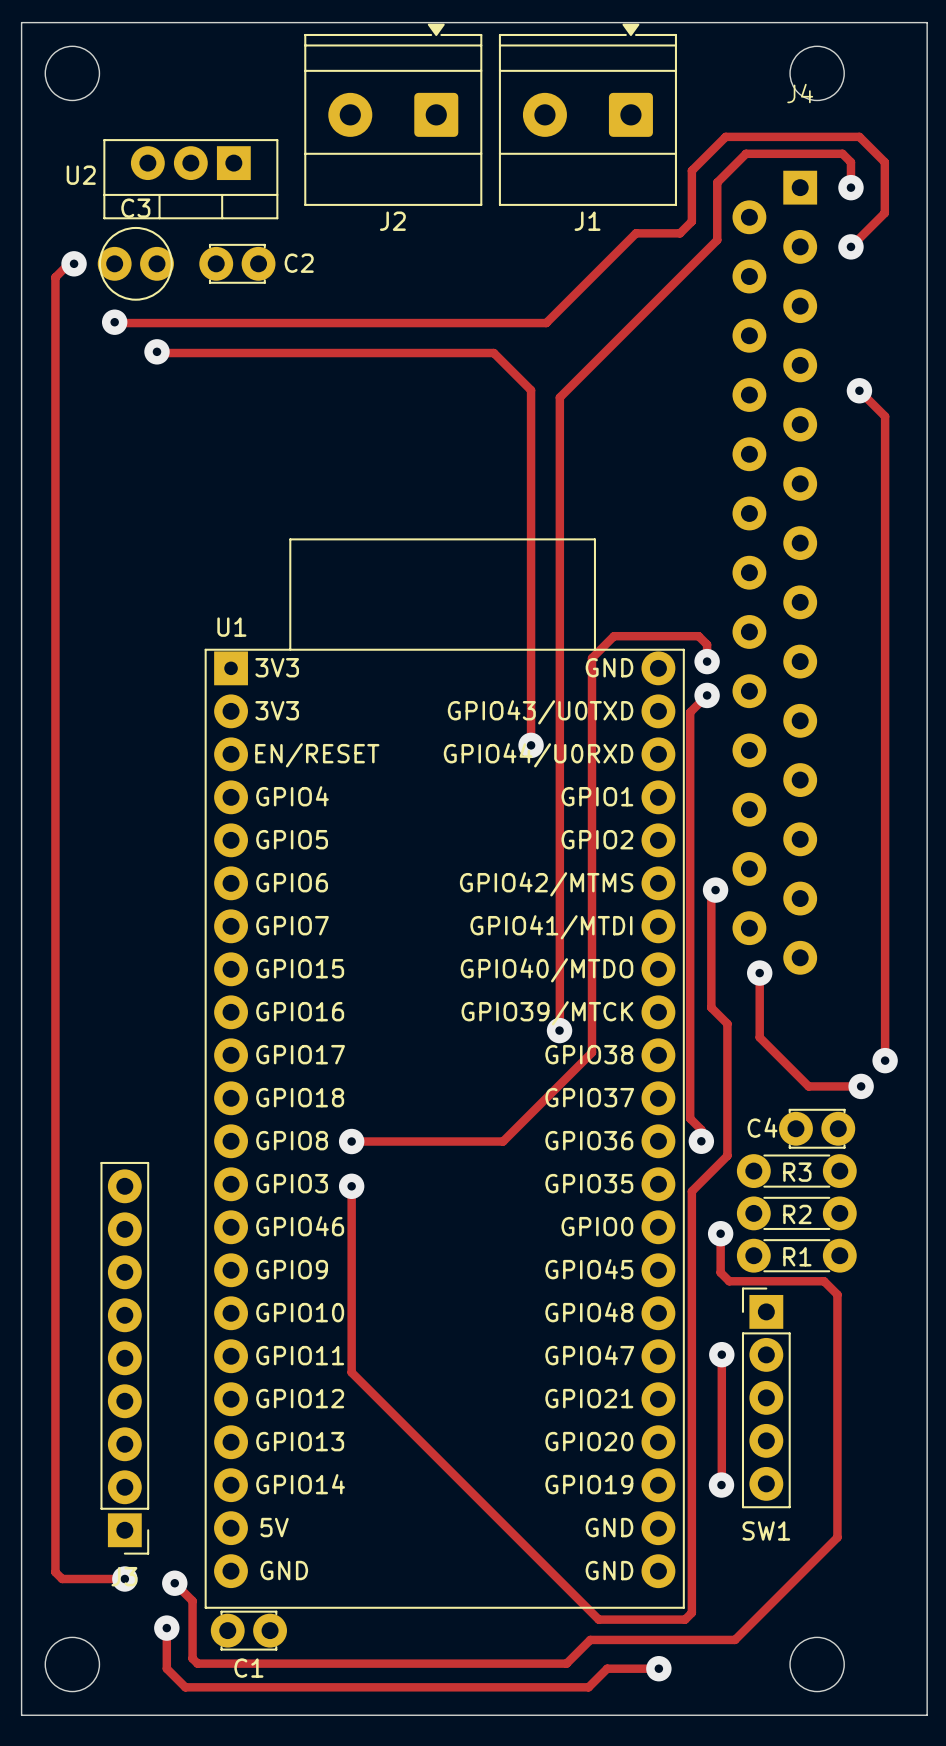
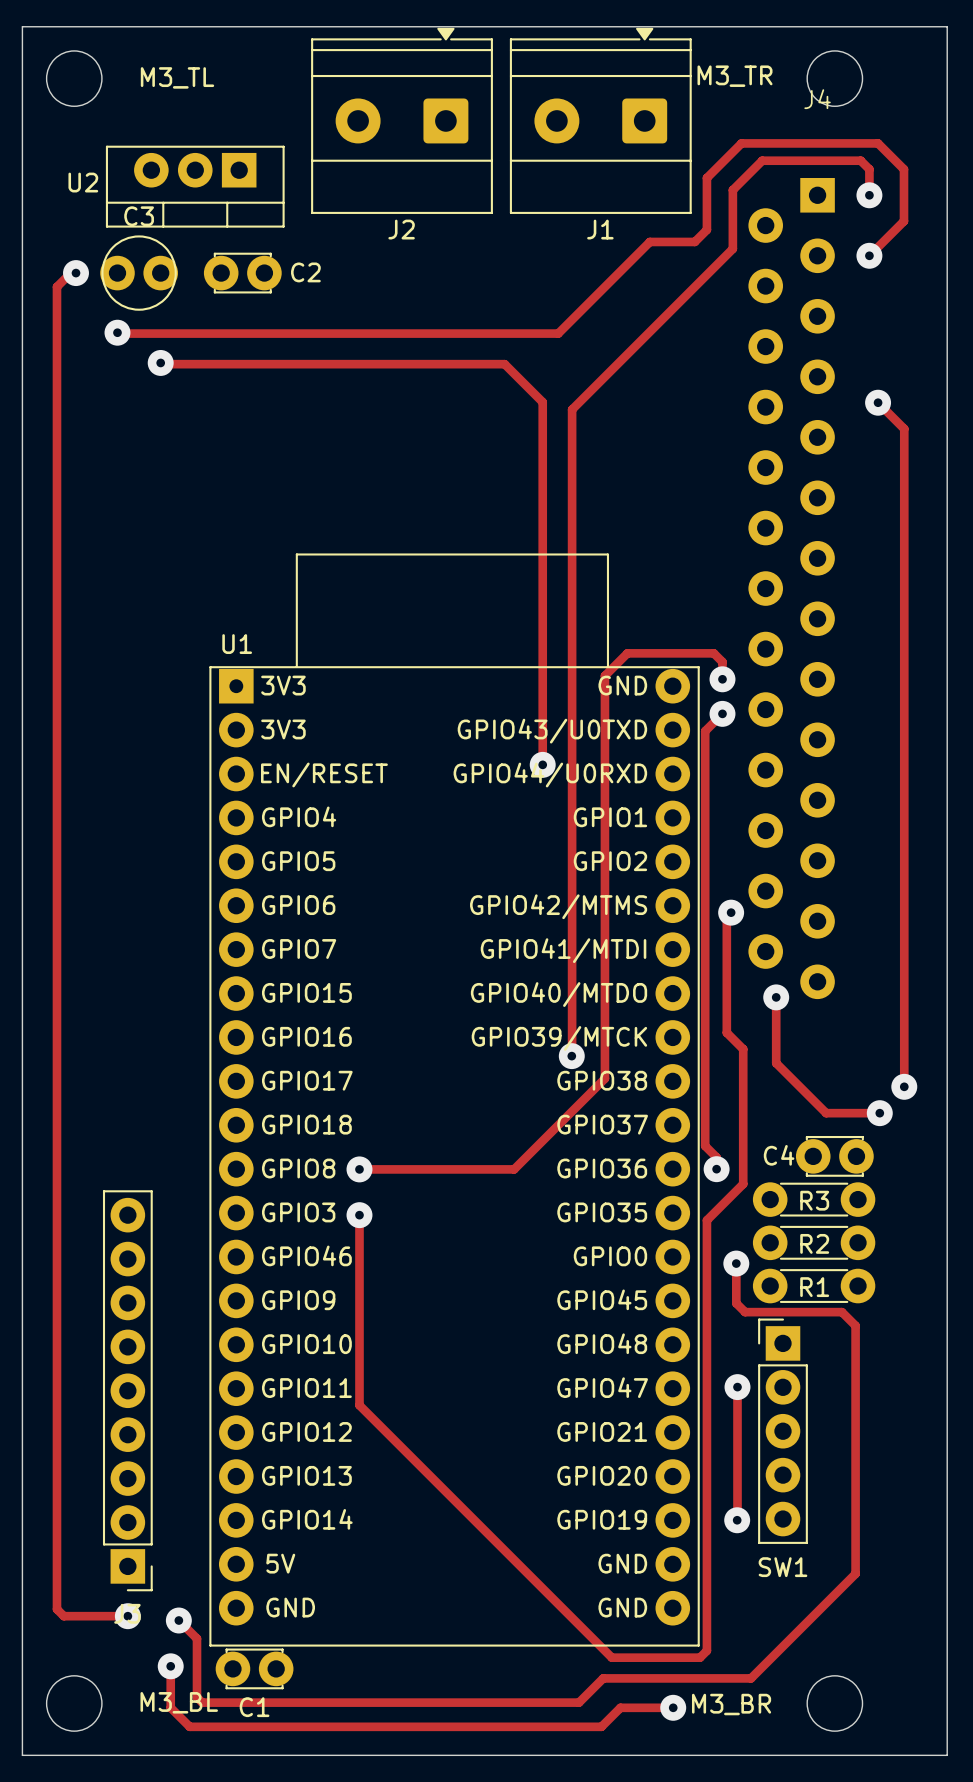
M3_TR name: none -> M3_TR (735, 76)
M3_TL name: none -> M3_TL (177, 77)
M3_BL name: none -> M3_BL (179, 1702)
M3_BR name: none -> M3_BR (731, 1704)

